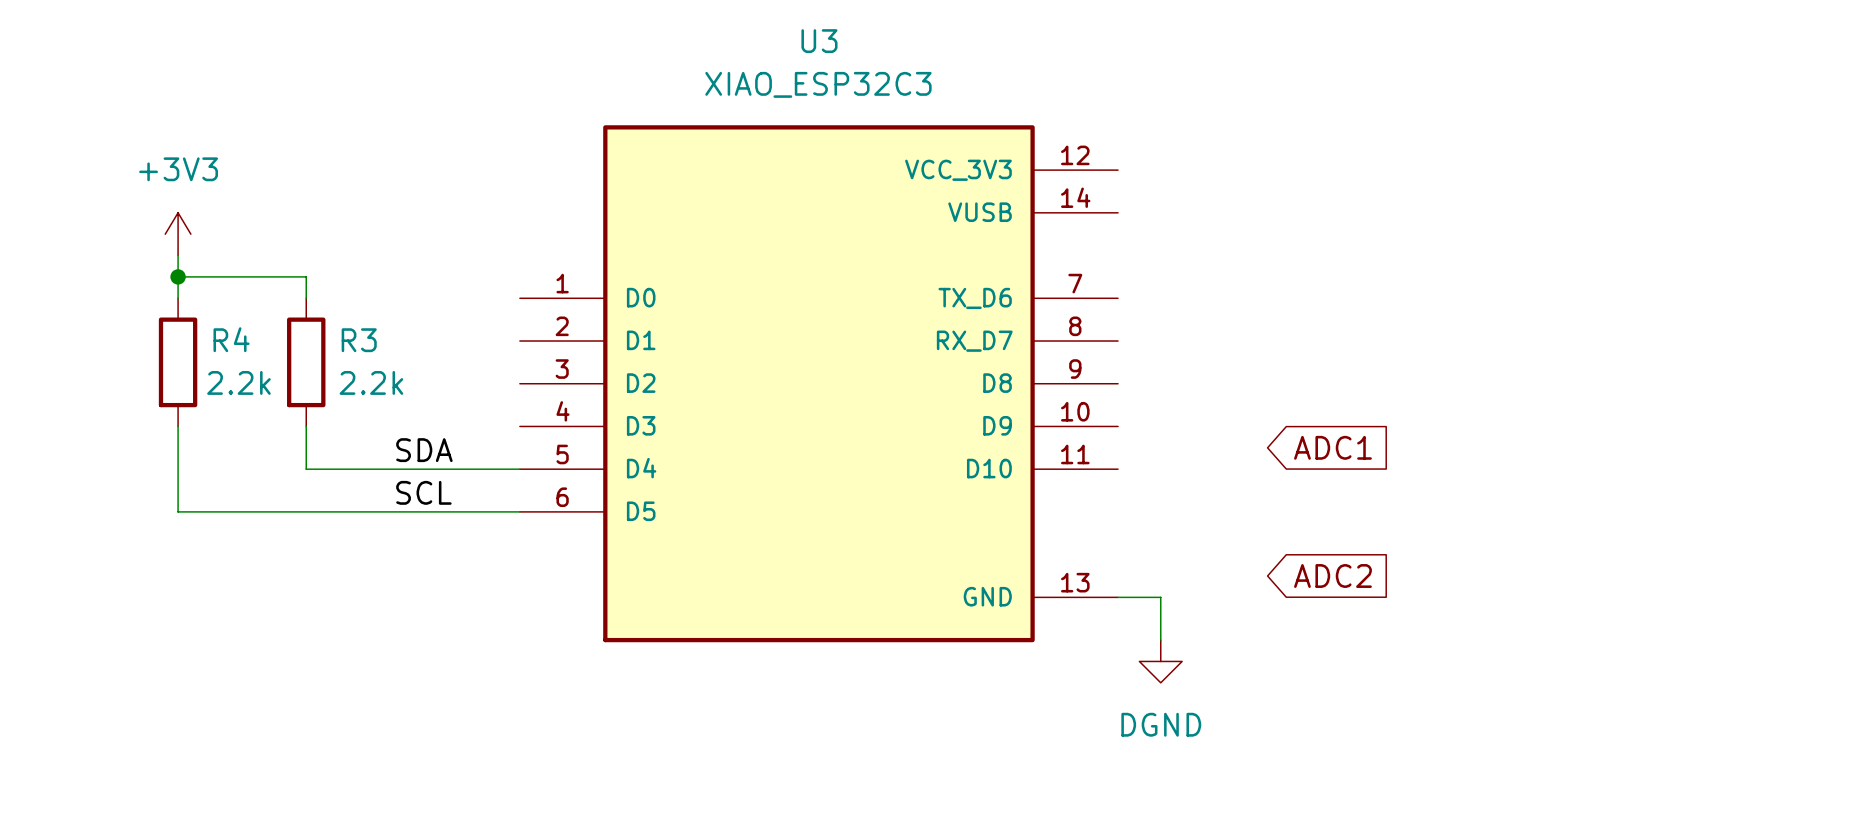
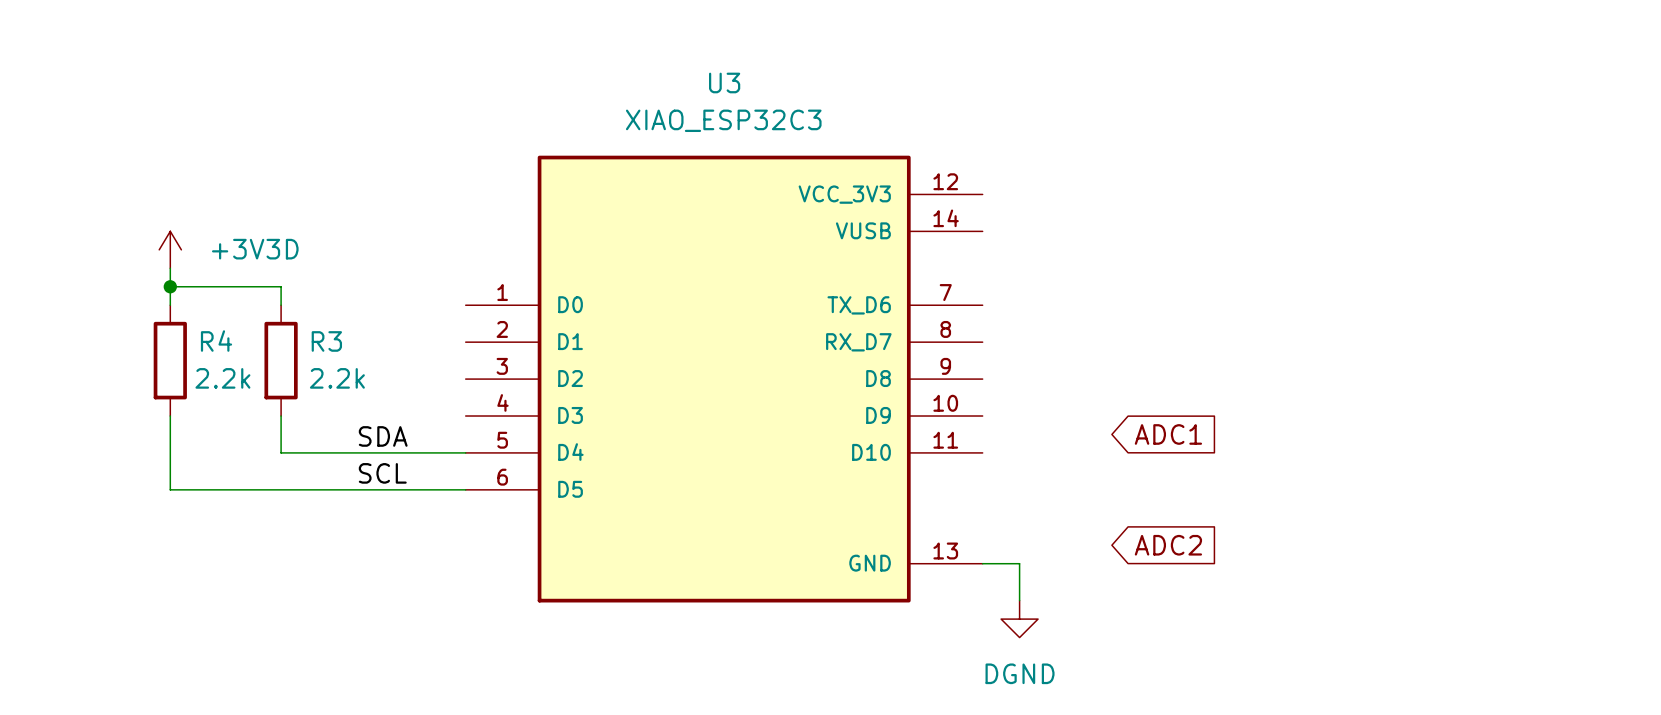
power symbol: +3V3 (178, 234) -> +3V3D (170, 249)

